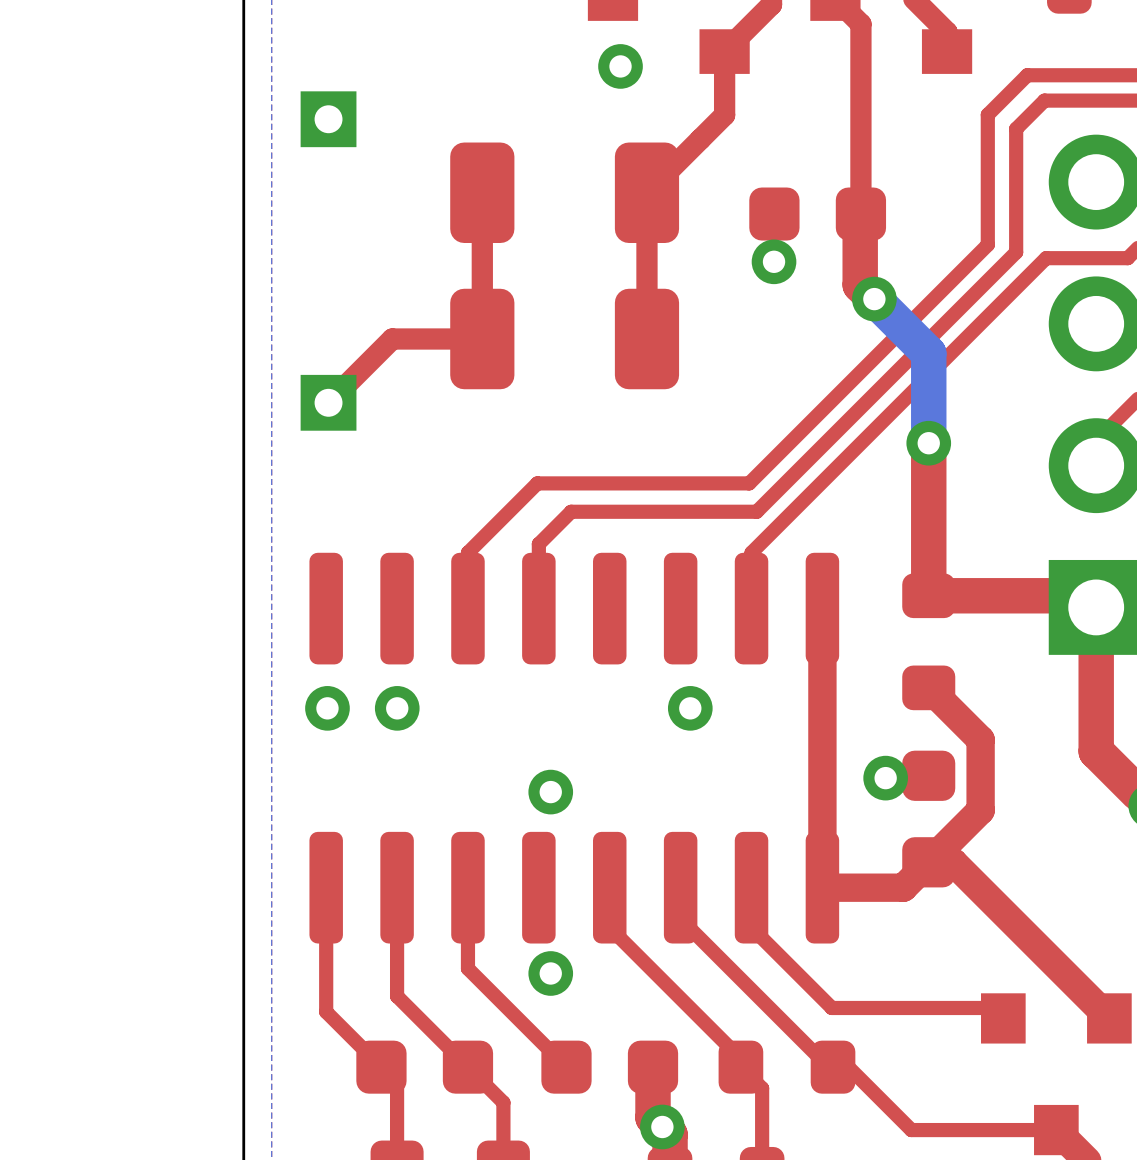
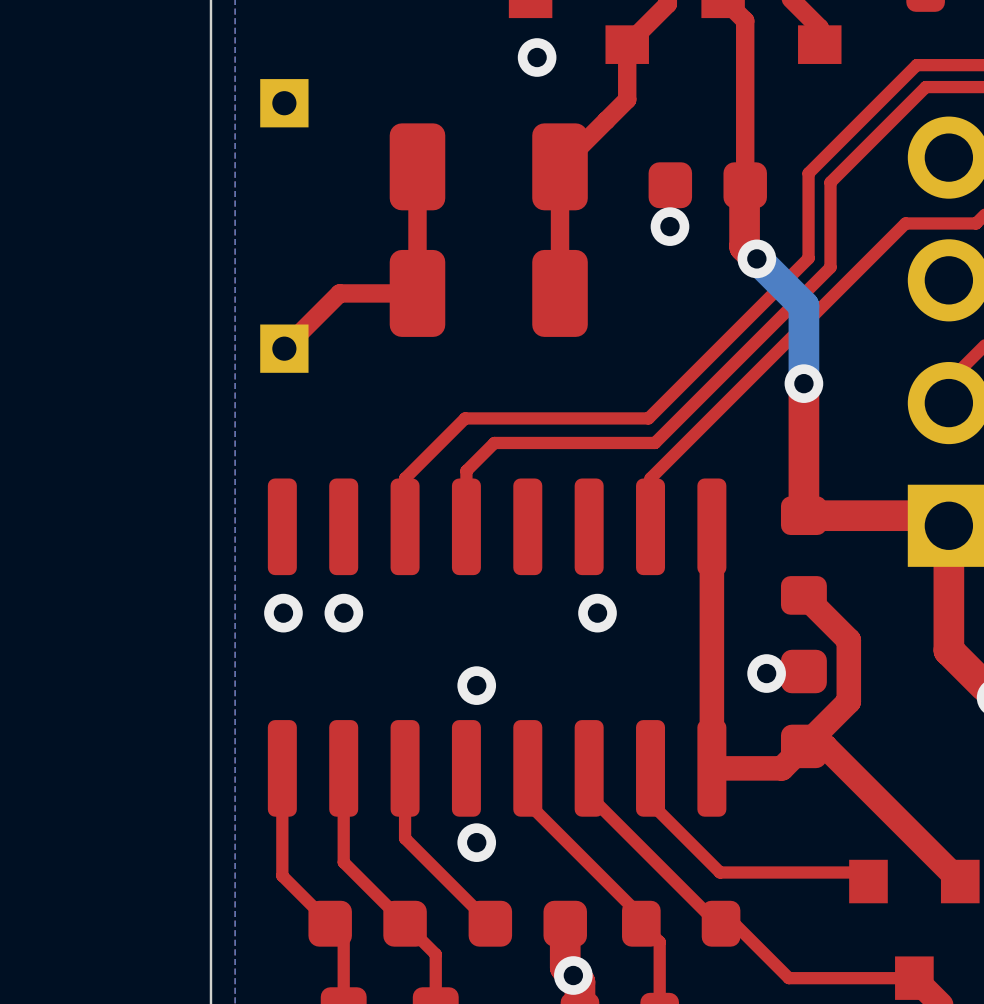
top track: (1059, 75) (1027, 75) (987, 114) (987, 244) (934, 298) -> (916, 65) (808, 173) (808, 258)
top track: (1069, 100) (1044, 100) (1016, 128) (1016, 252) (959, 309) -> (925, 87) (830, 182) (830, 267)

